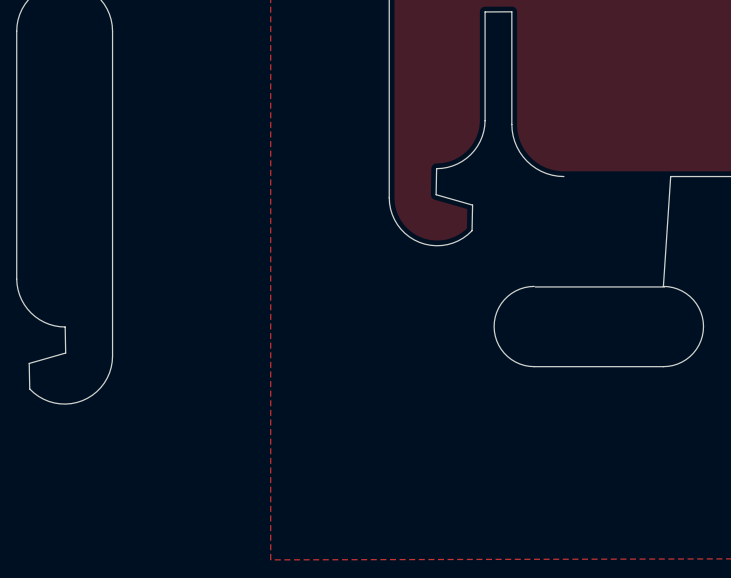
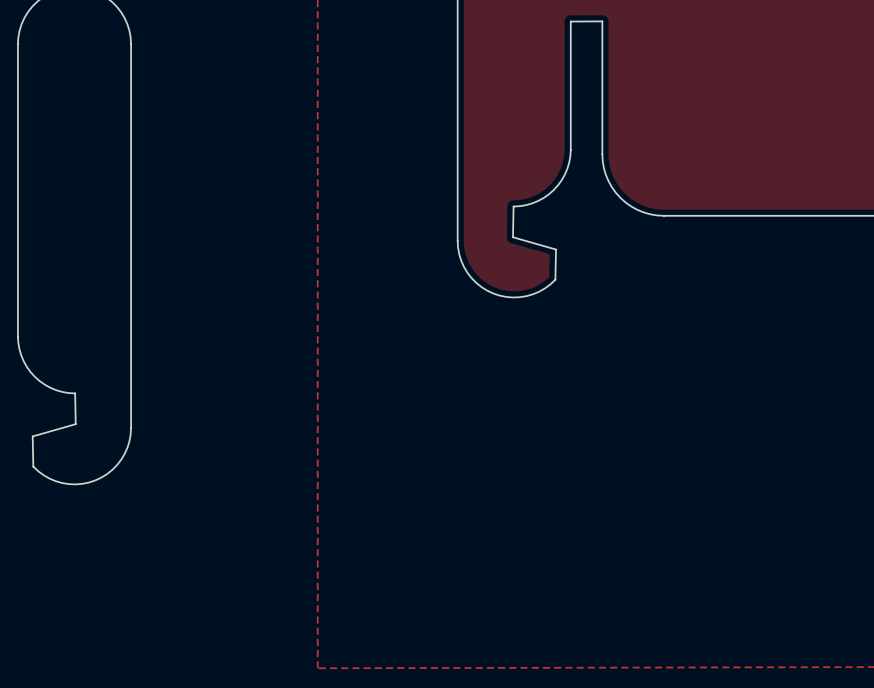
board edge: (670, 176) (663, 286) (673, 287) (686, 293) (693, 299) (700, 312) (703, 326) (702, 336) (698, 345) (690, 356) (677, 364) (663, 366) (534, 366) (515, 362) (504, 353) (496, 340) (494, 331) (495, 316) (498, 307) (507, 296) (520, 289) (534, 286) -> (789, 215) (663, 215)
board edge: (664, 286) (535, 286) -> none

